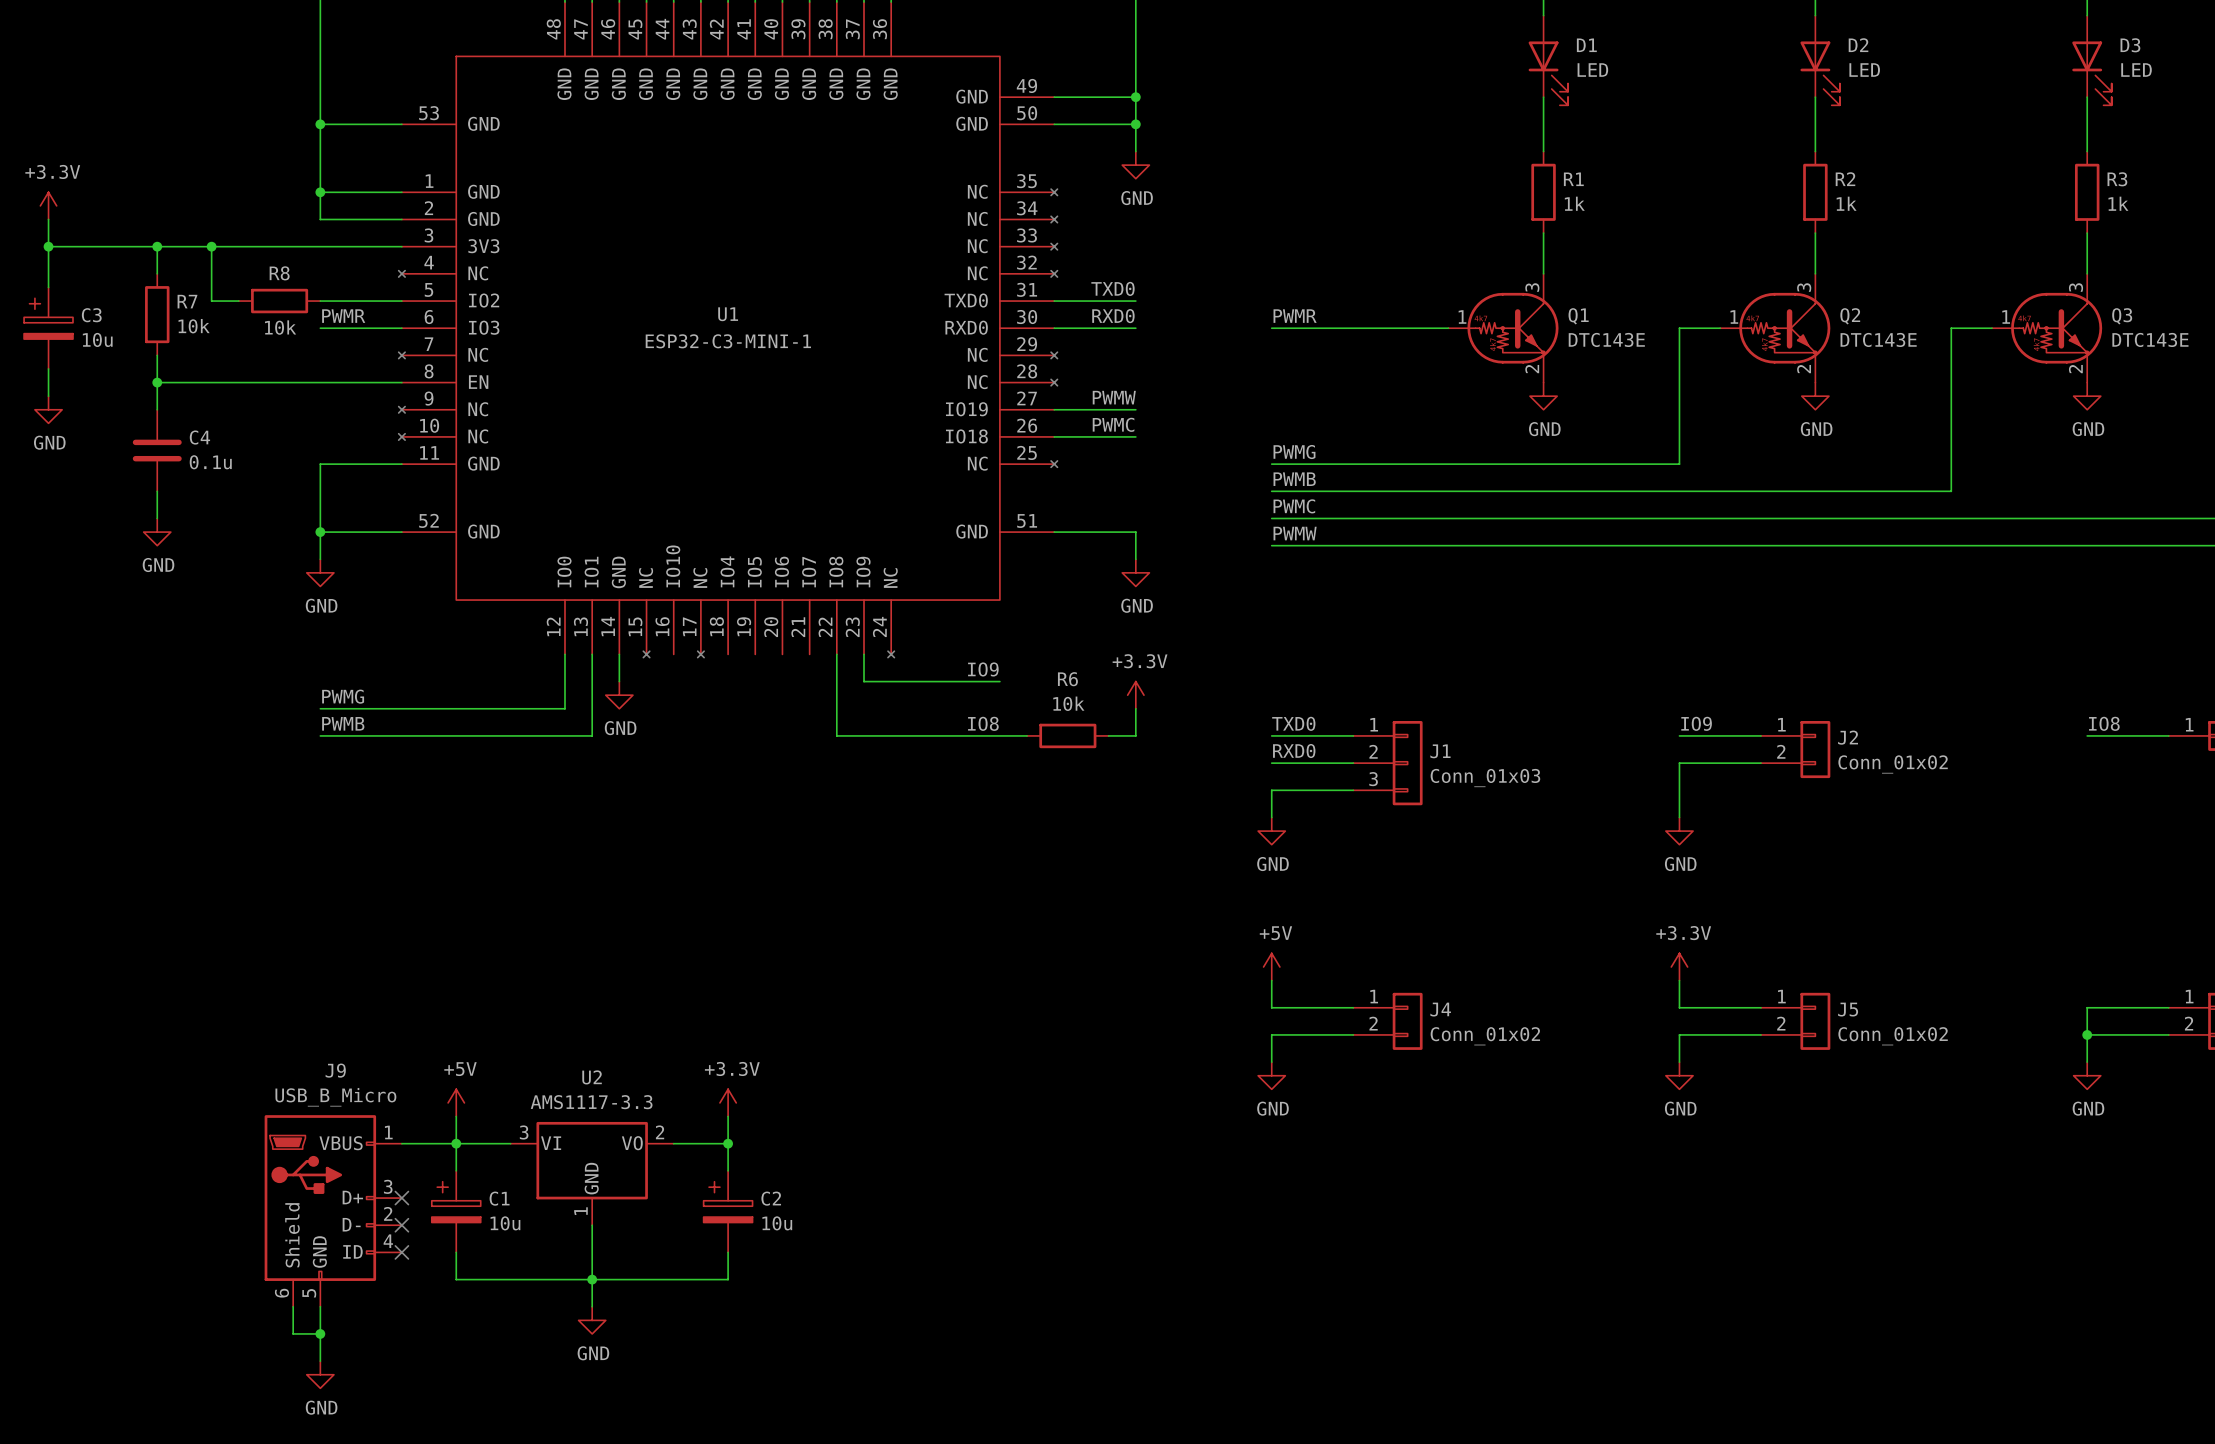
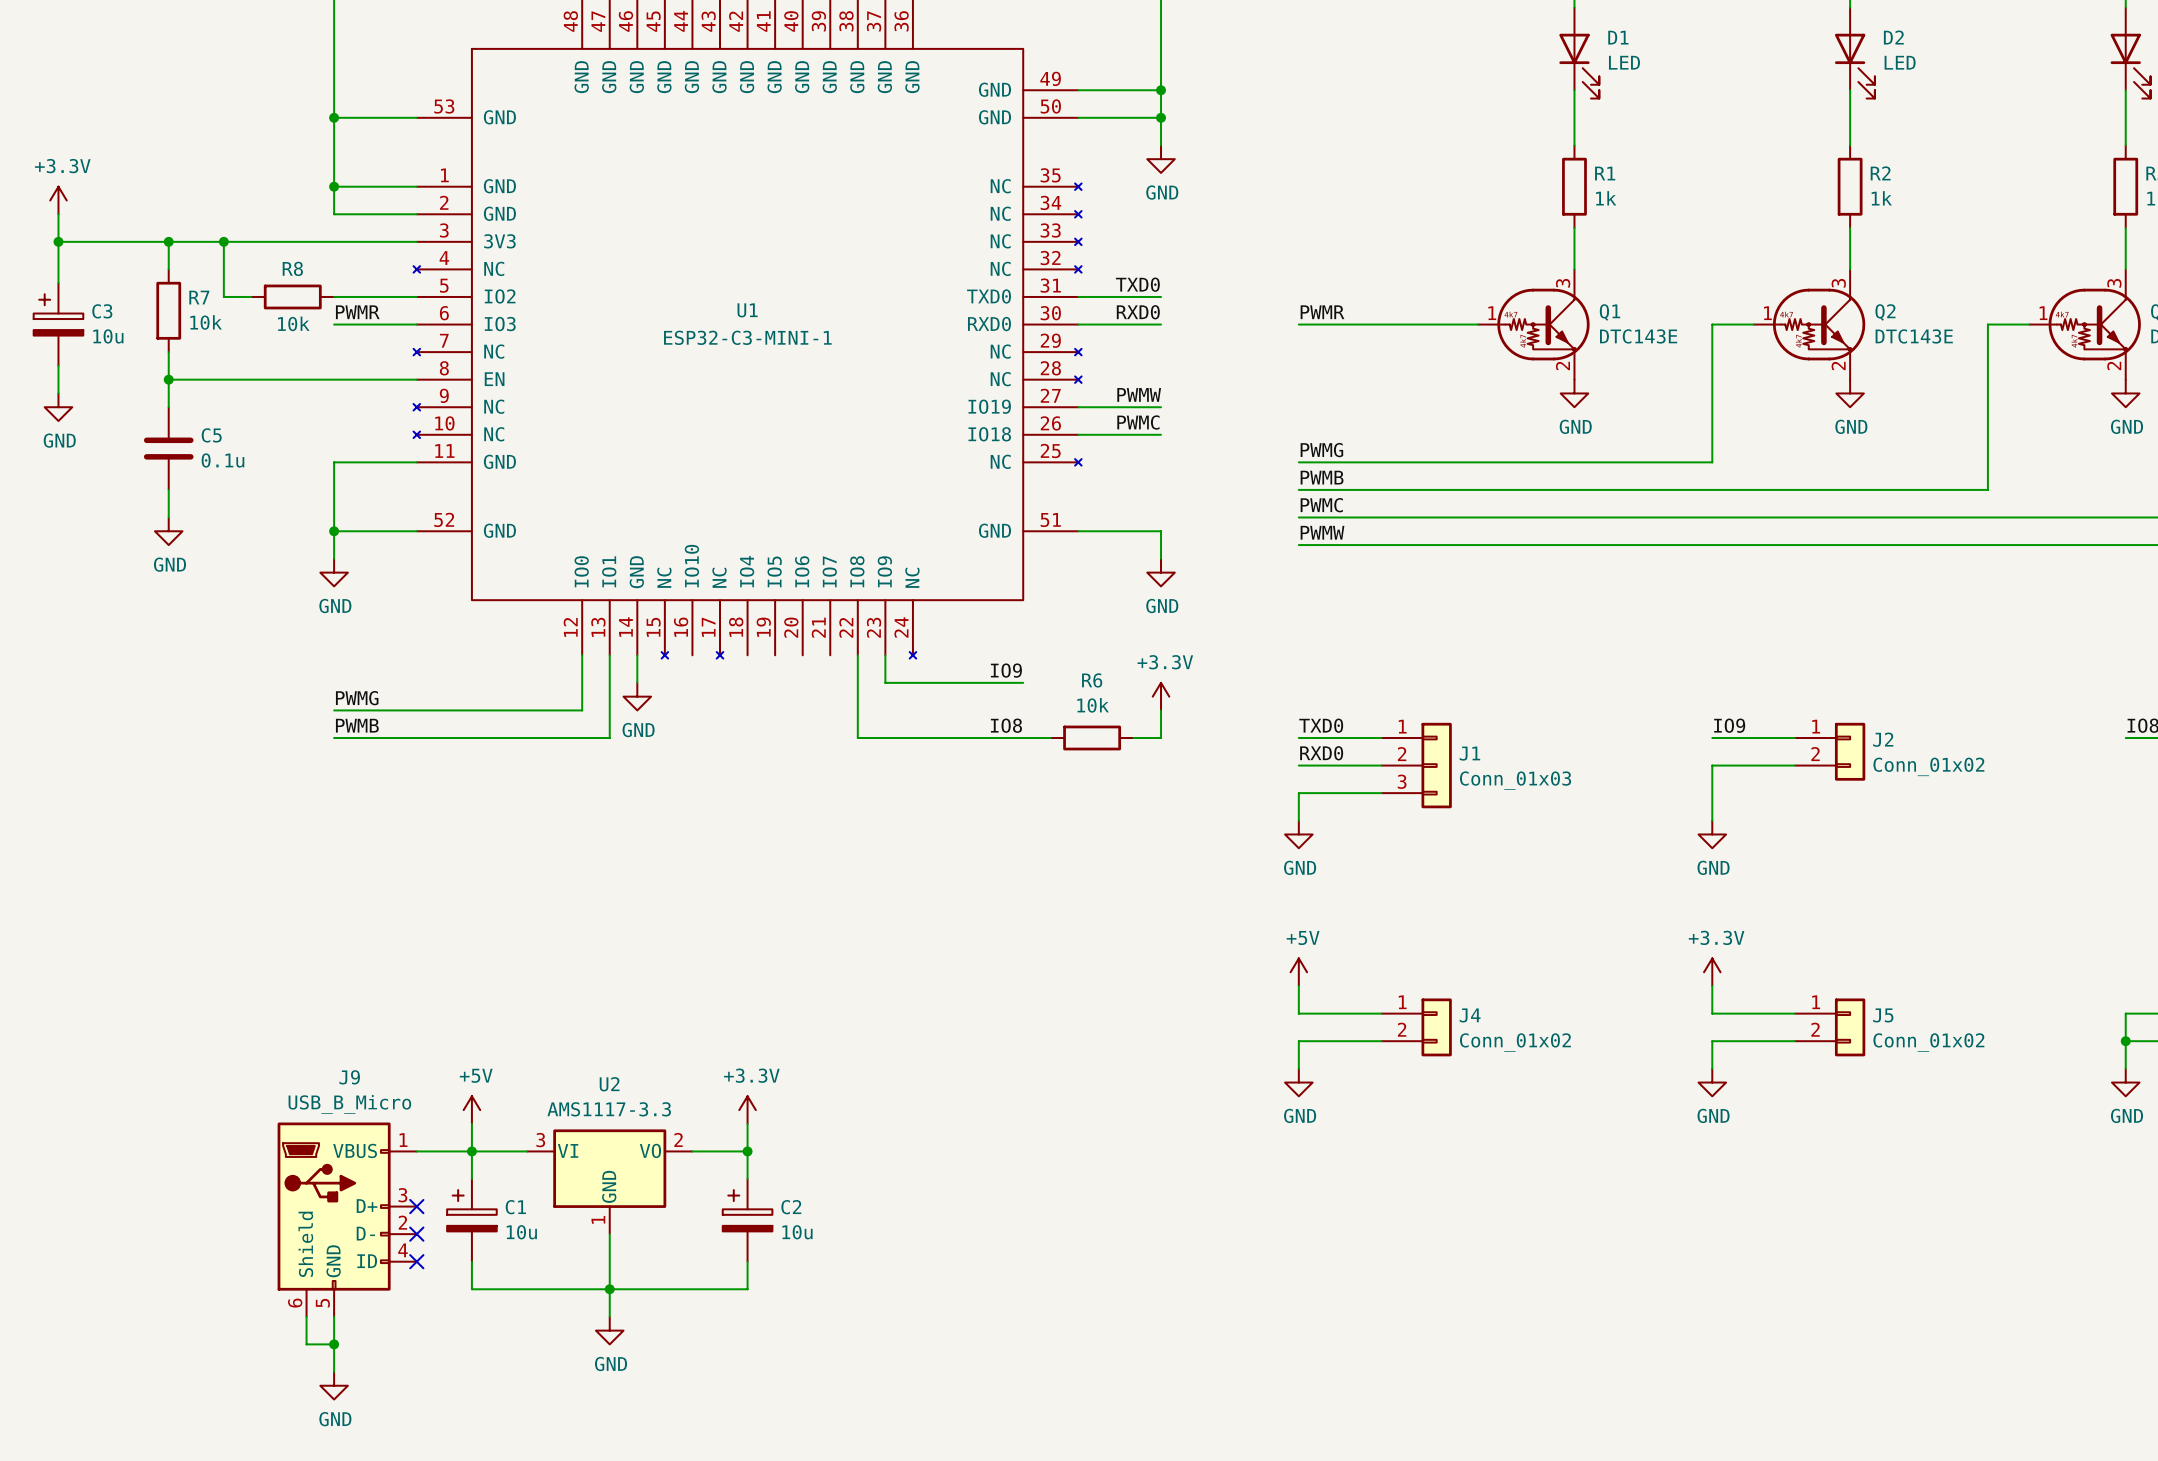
C4 name: C4 (199, 437) -> C5 (211, 435)

